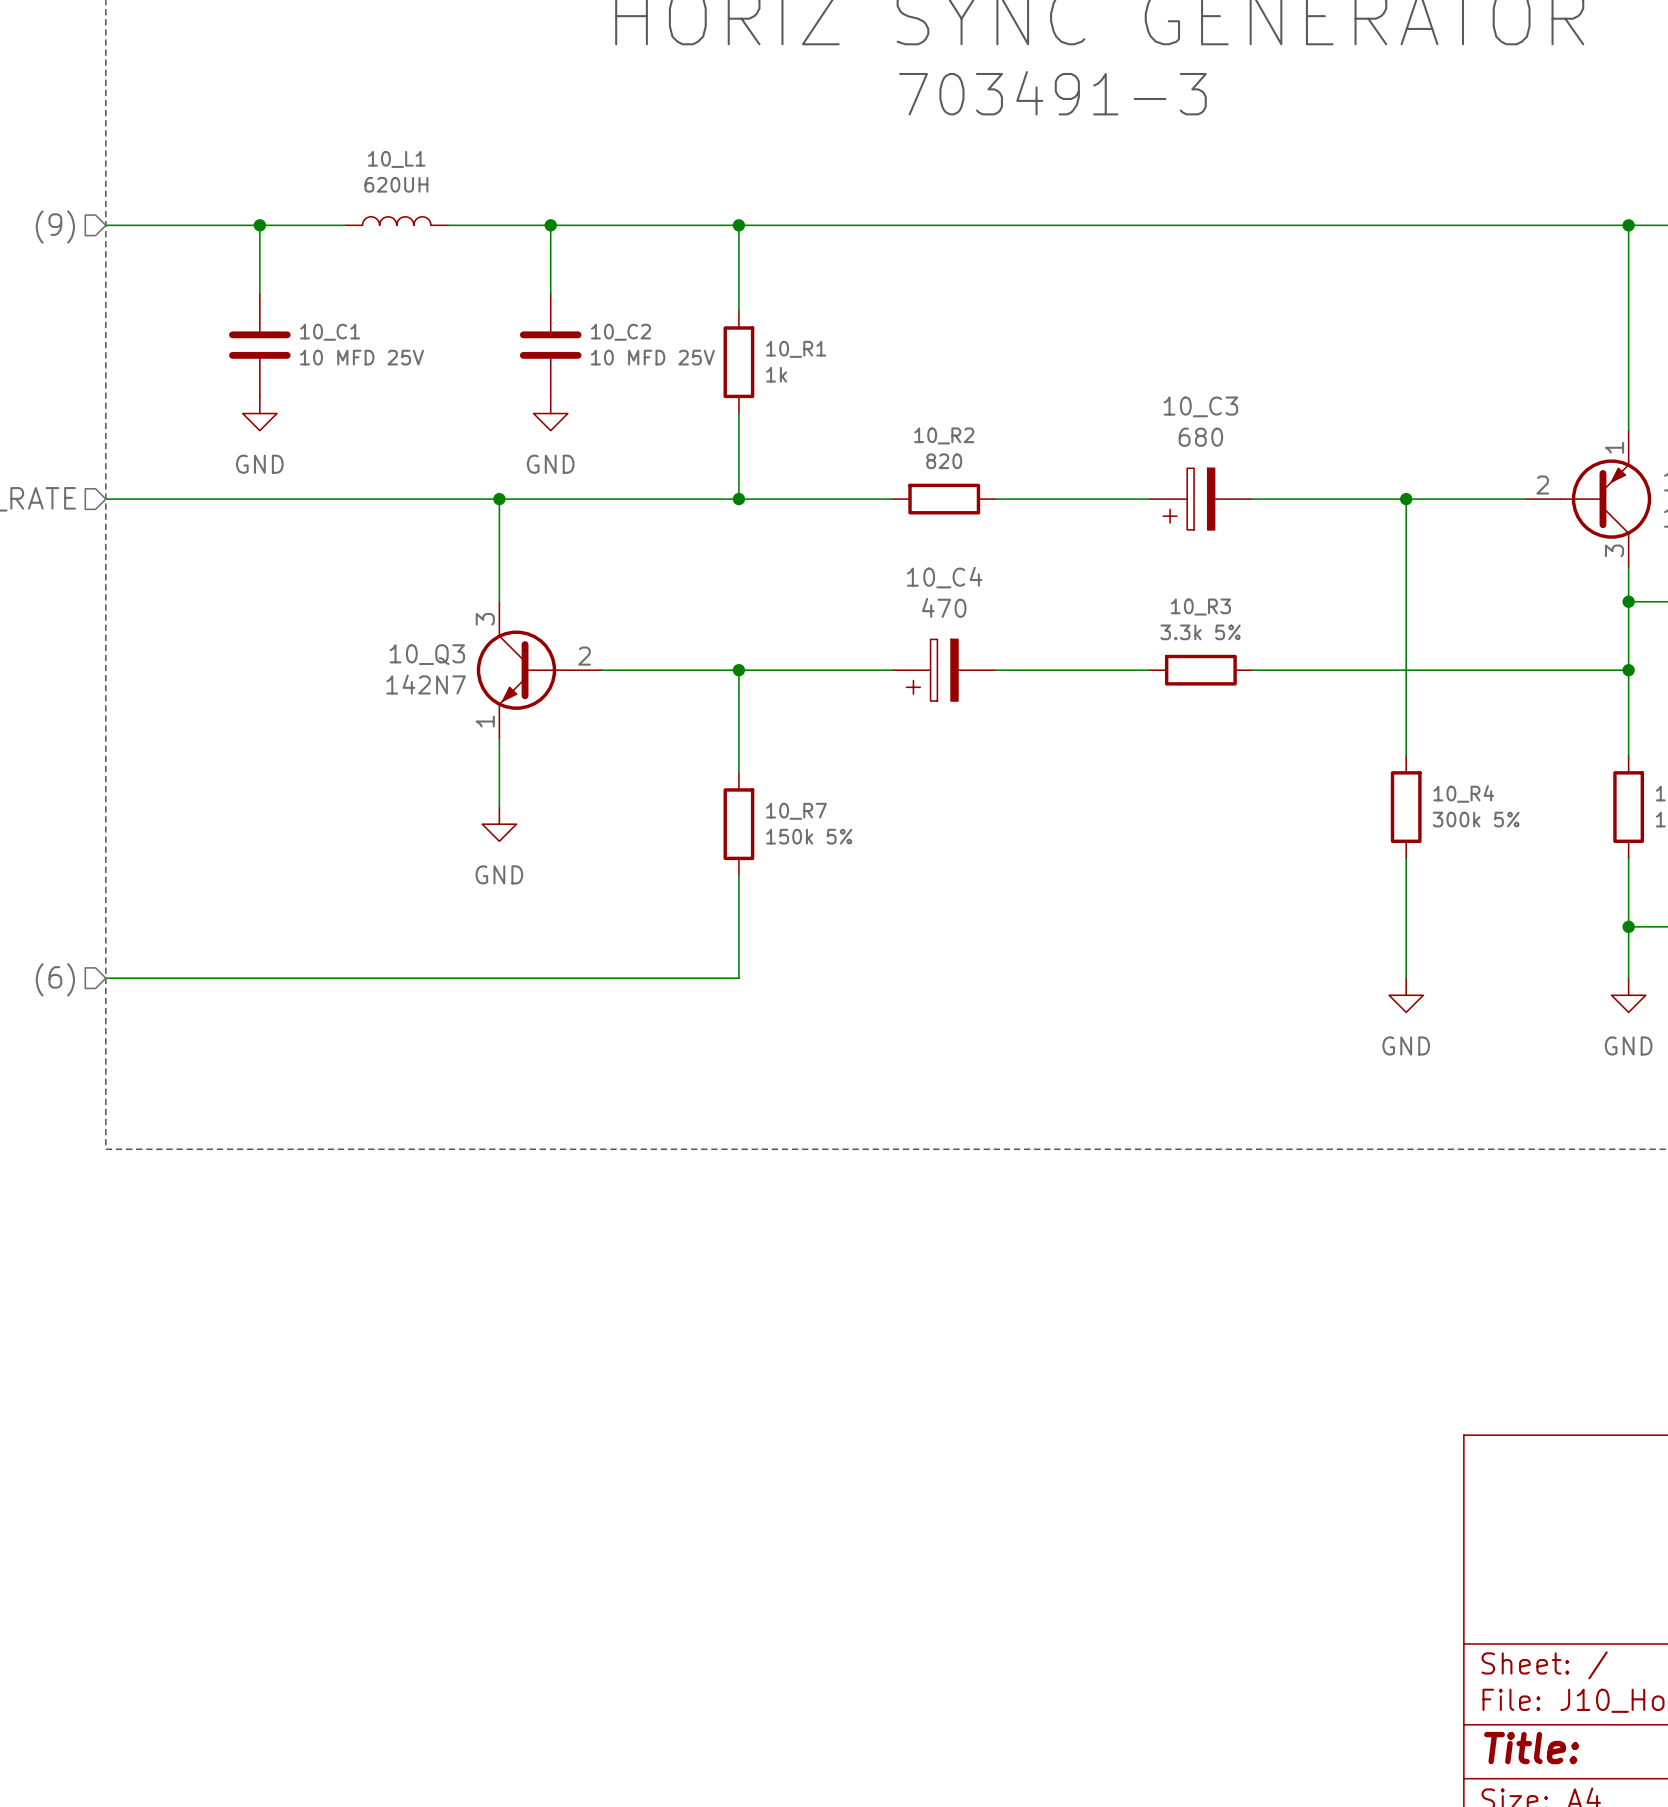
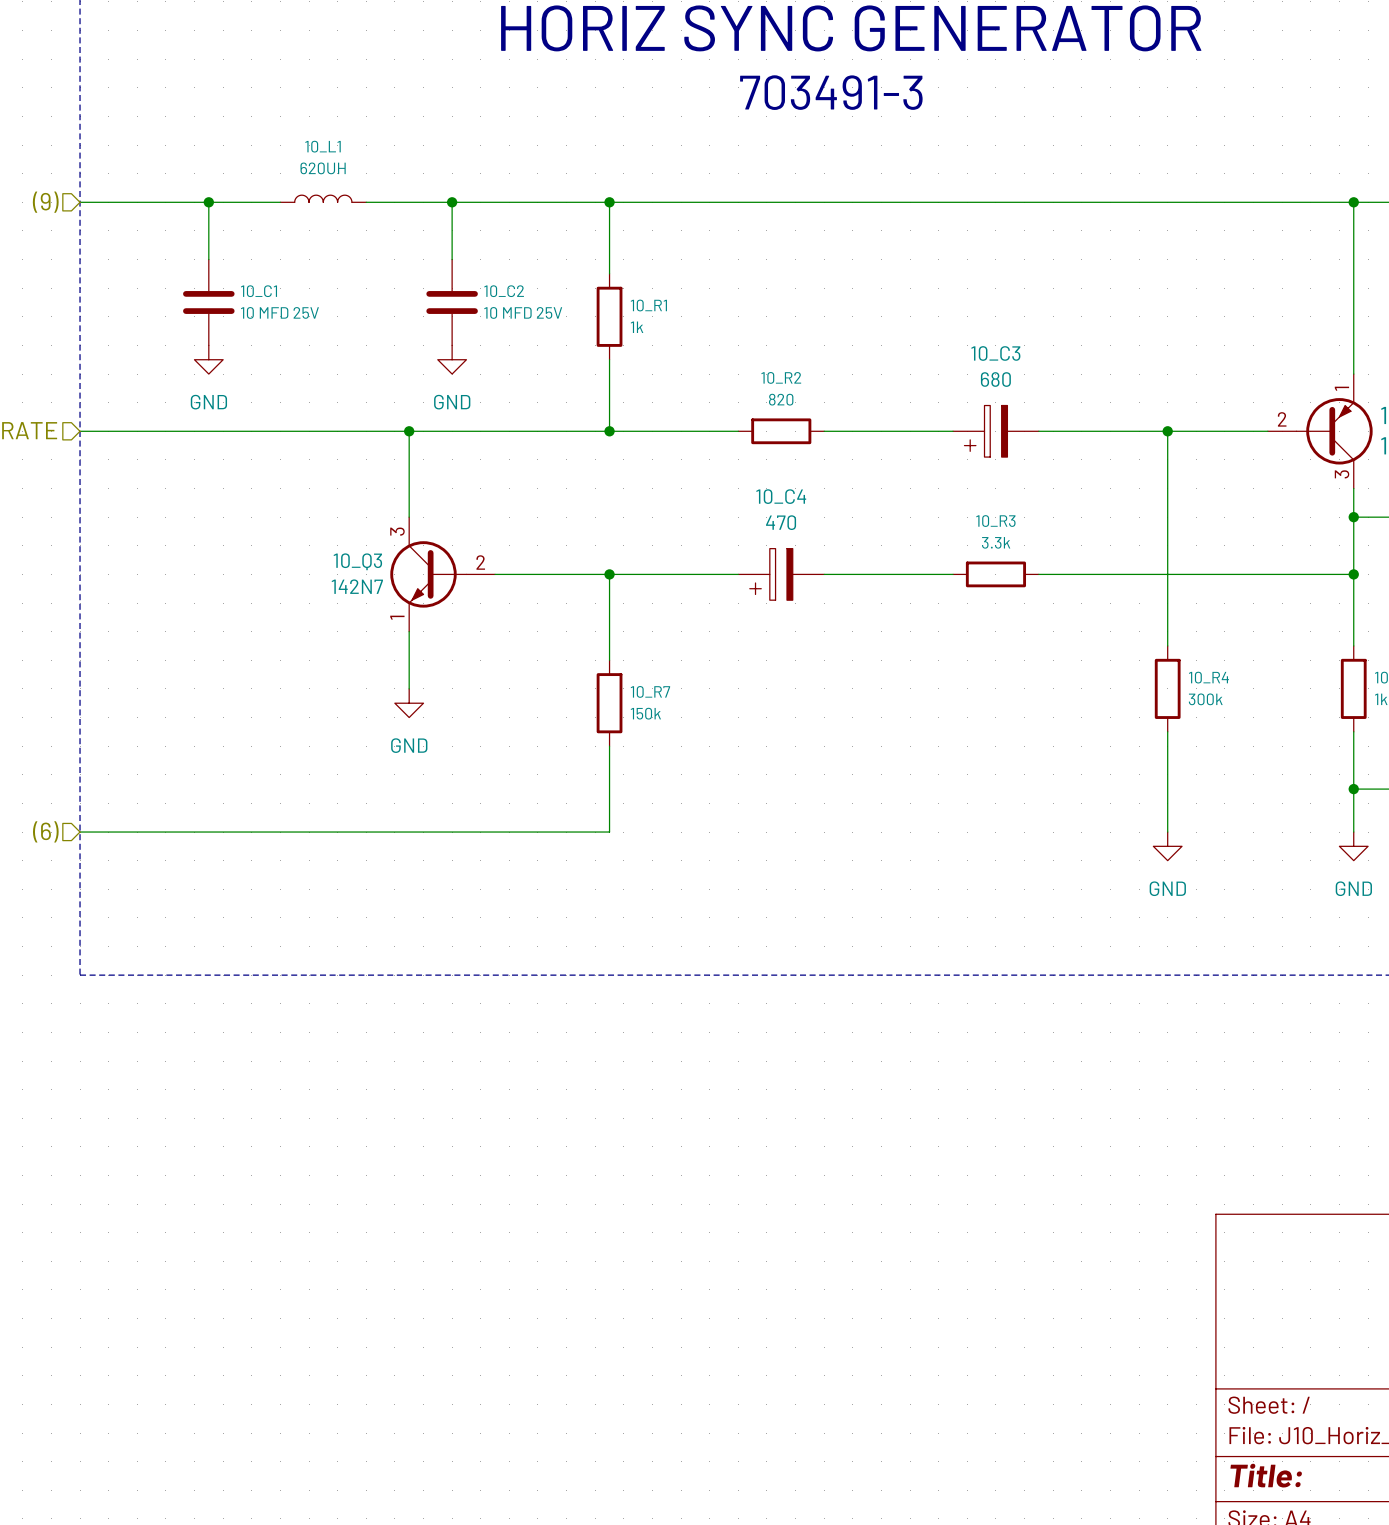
10_R3 value: 3.3k 5% (1200, 632) -> 3.3k (996, 542)
10_R4 value: 300k 5% (1476, 819) -> 300k (1205, 699)
10_R7 value: 150k 5% (809, 836) -> 150k (645, 713)

